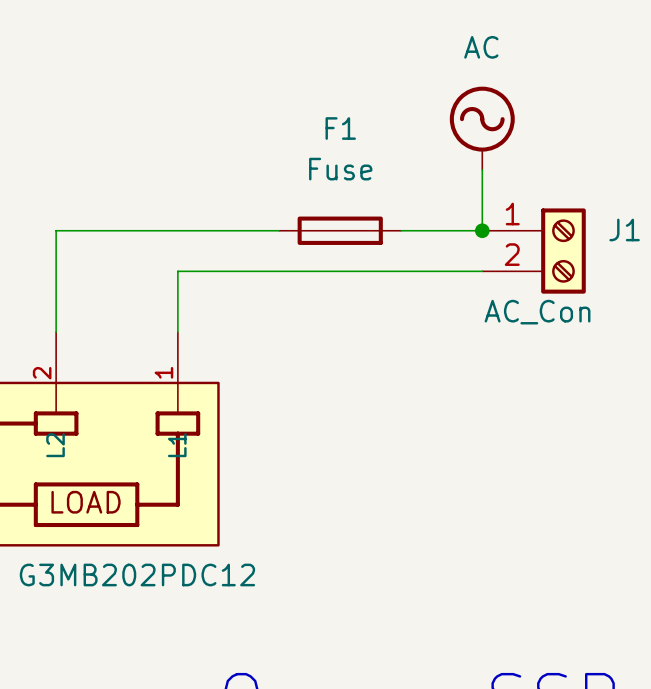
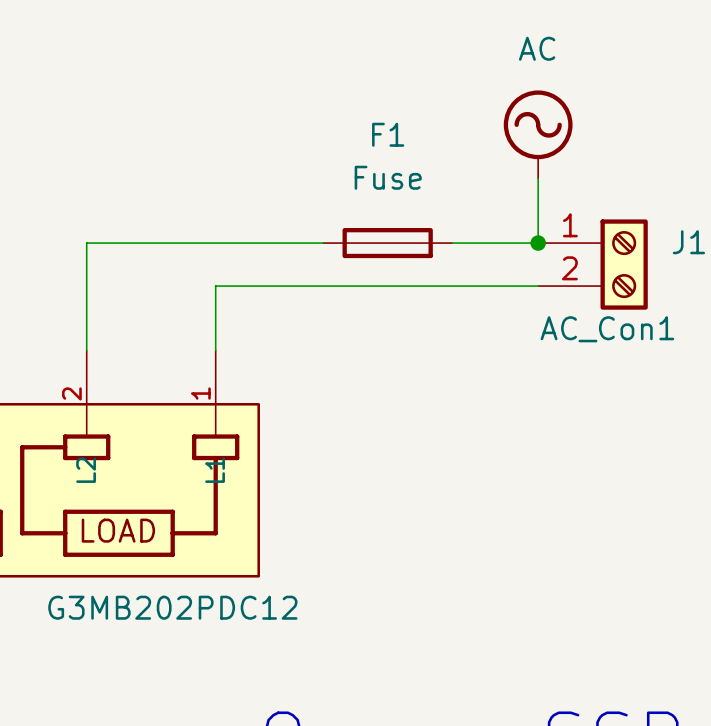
J1 value: AC_Con (537, 312) -> AC_Con1 (607, 329)

